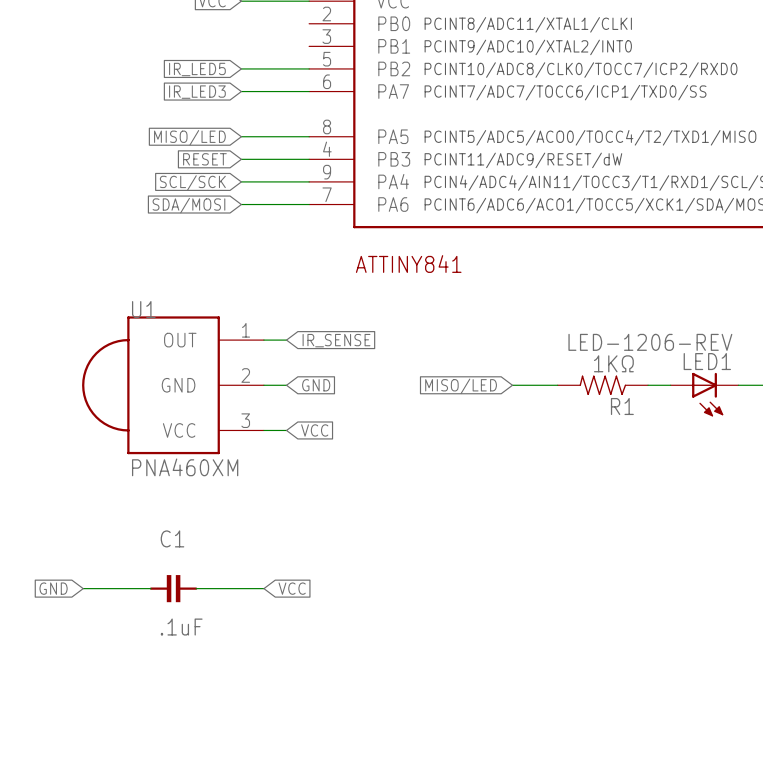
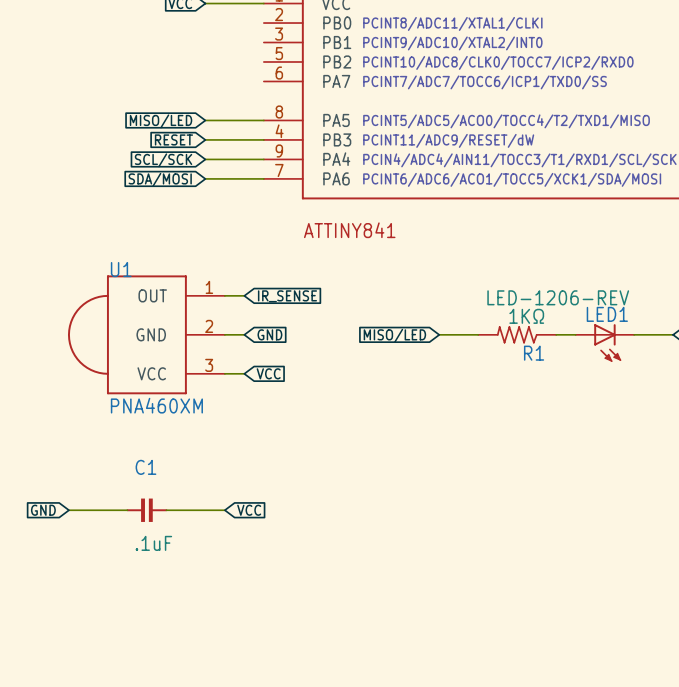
wire: (241, 68) (309, 68) -> none
global label: IR_LED5 (197, 69) -> none
wire: (241, 91) (309, 91) -> none
global label: IR_LED3 (197, 92) -> none

